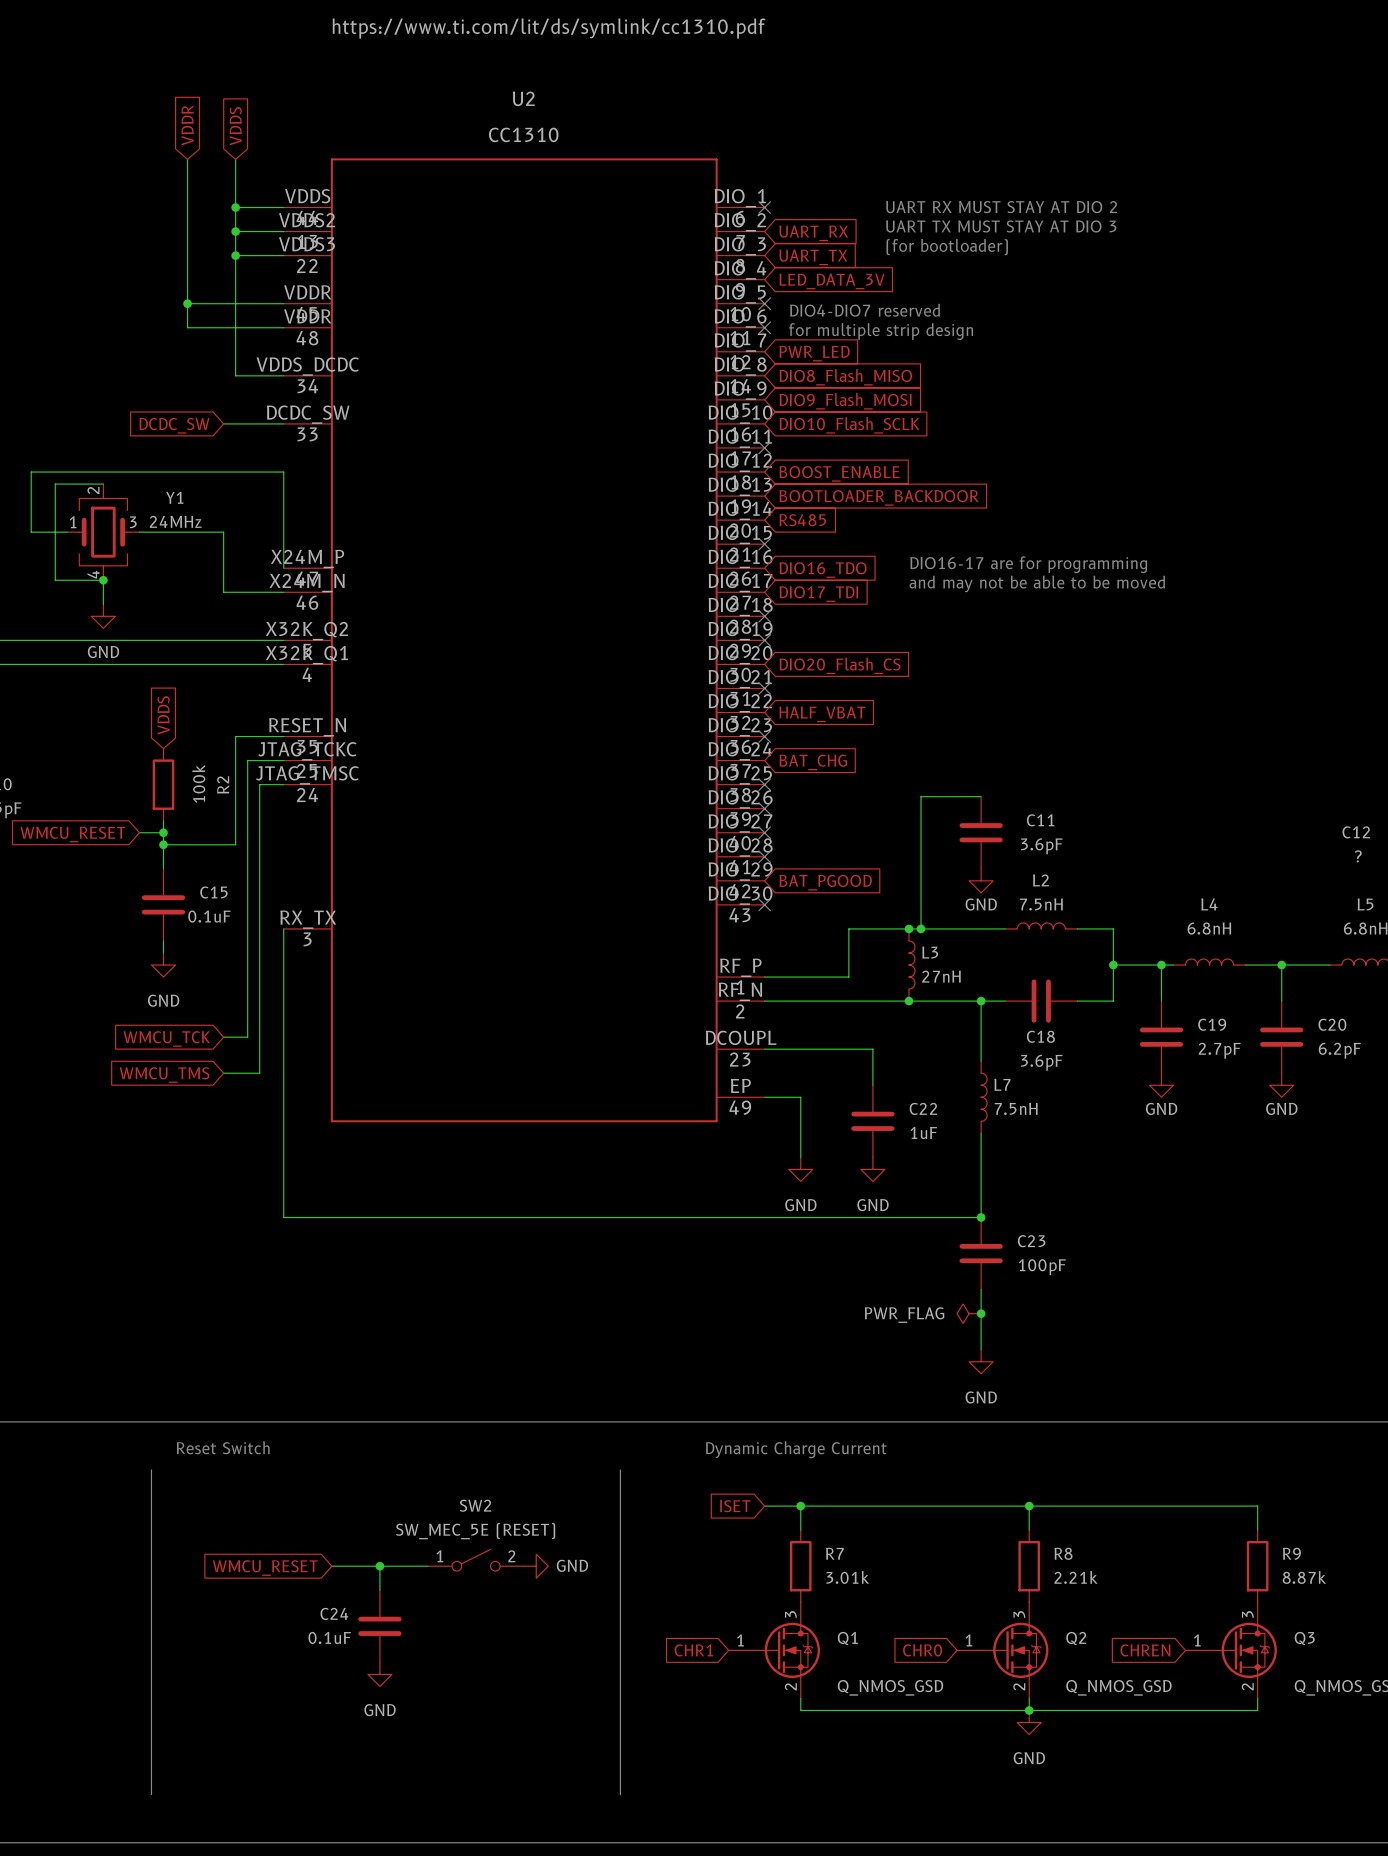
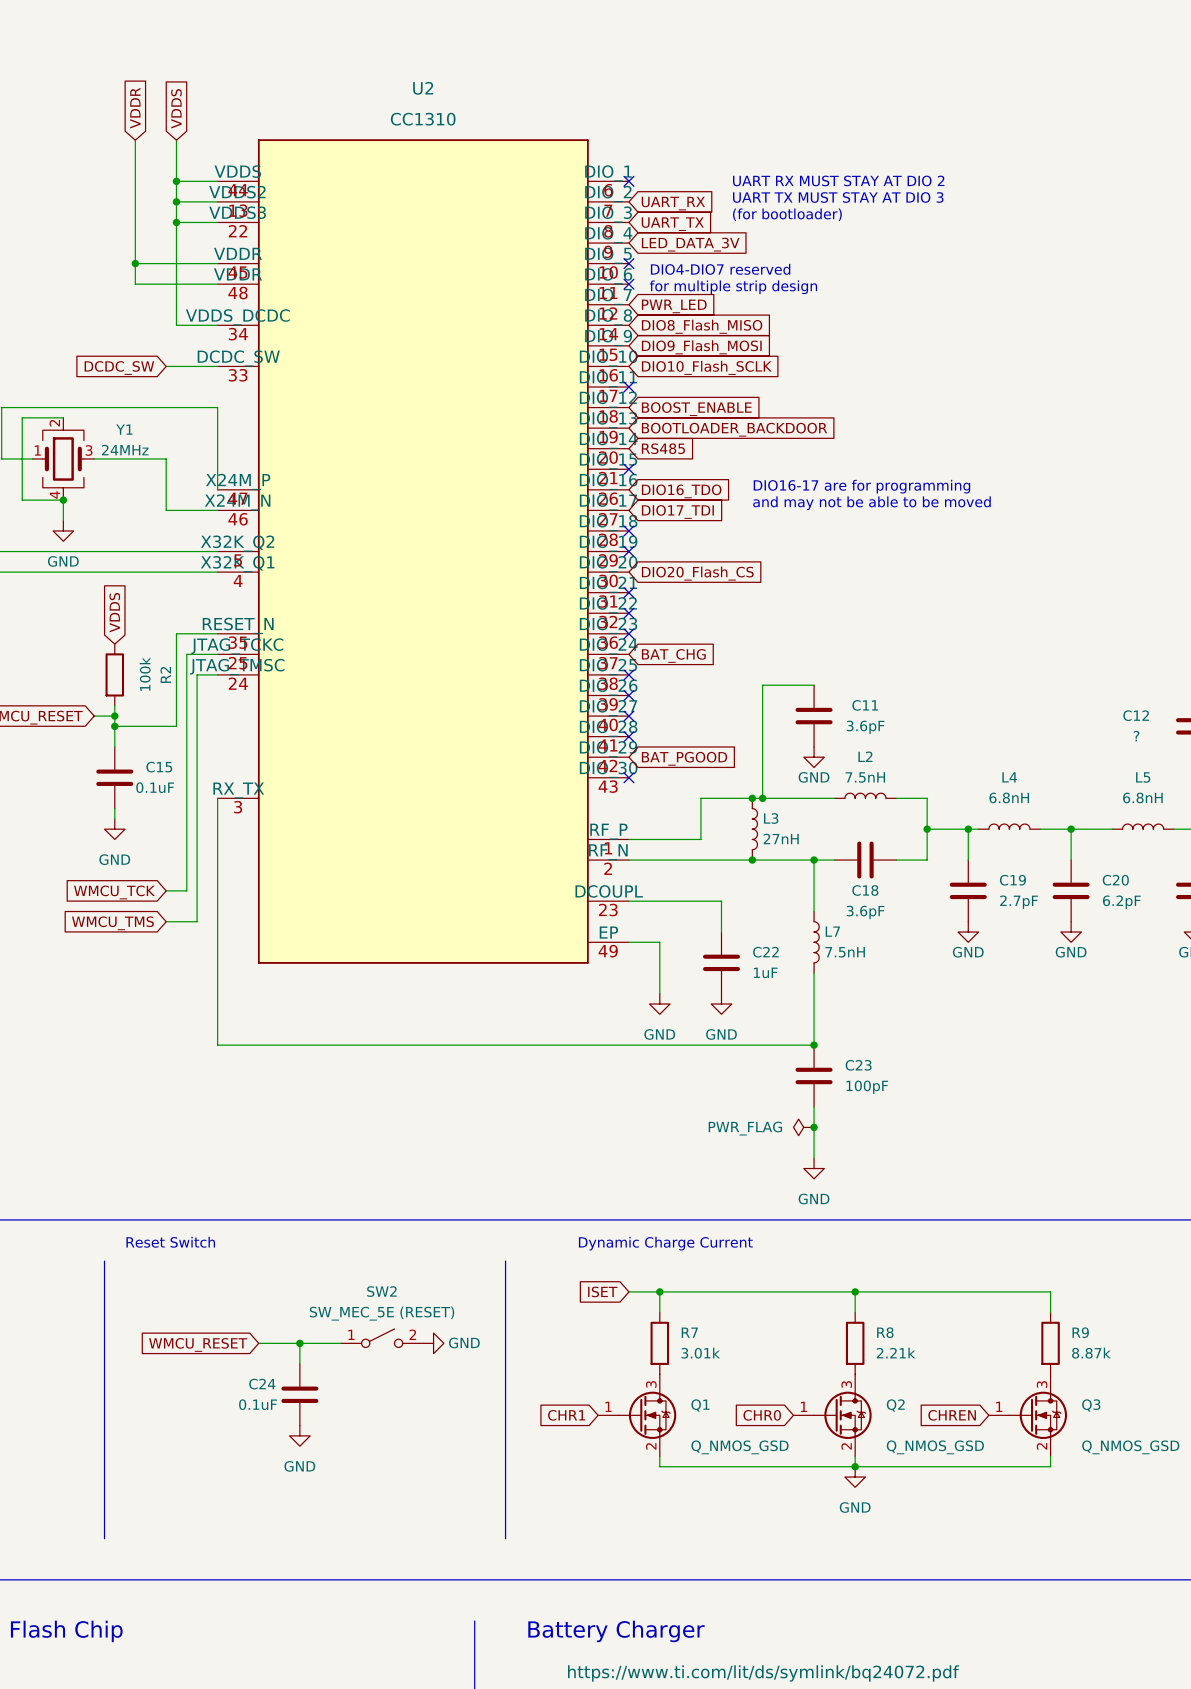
U2 text: https://www.ti.com/lit/ds/symlink/cc1310.pdf (549, 28) -> none
no-connect mark: none -> (628, 613)
global label: HALF_VBAT (822, 714) -> none

